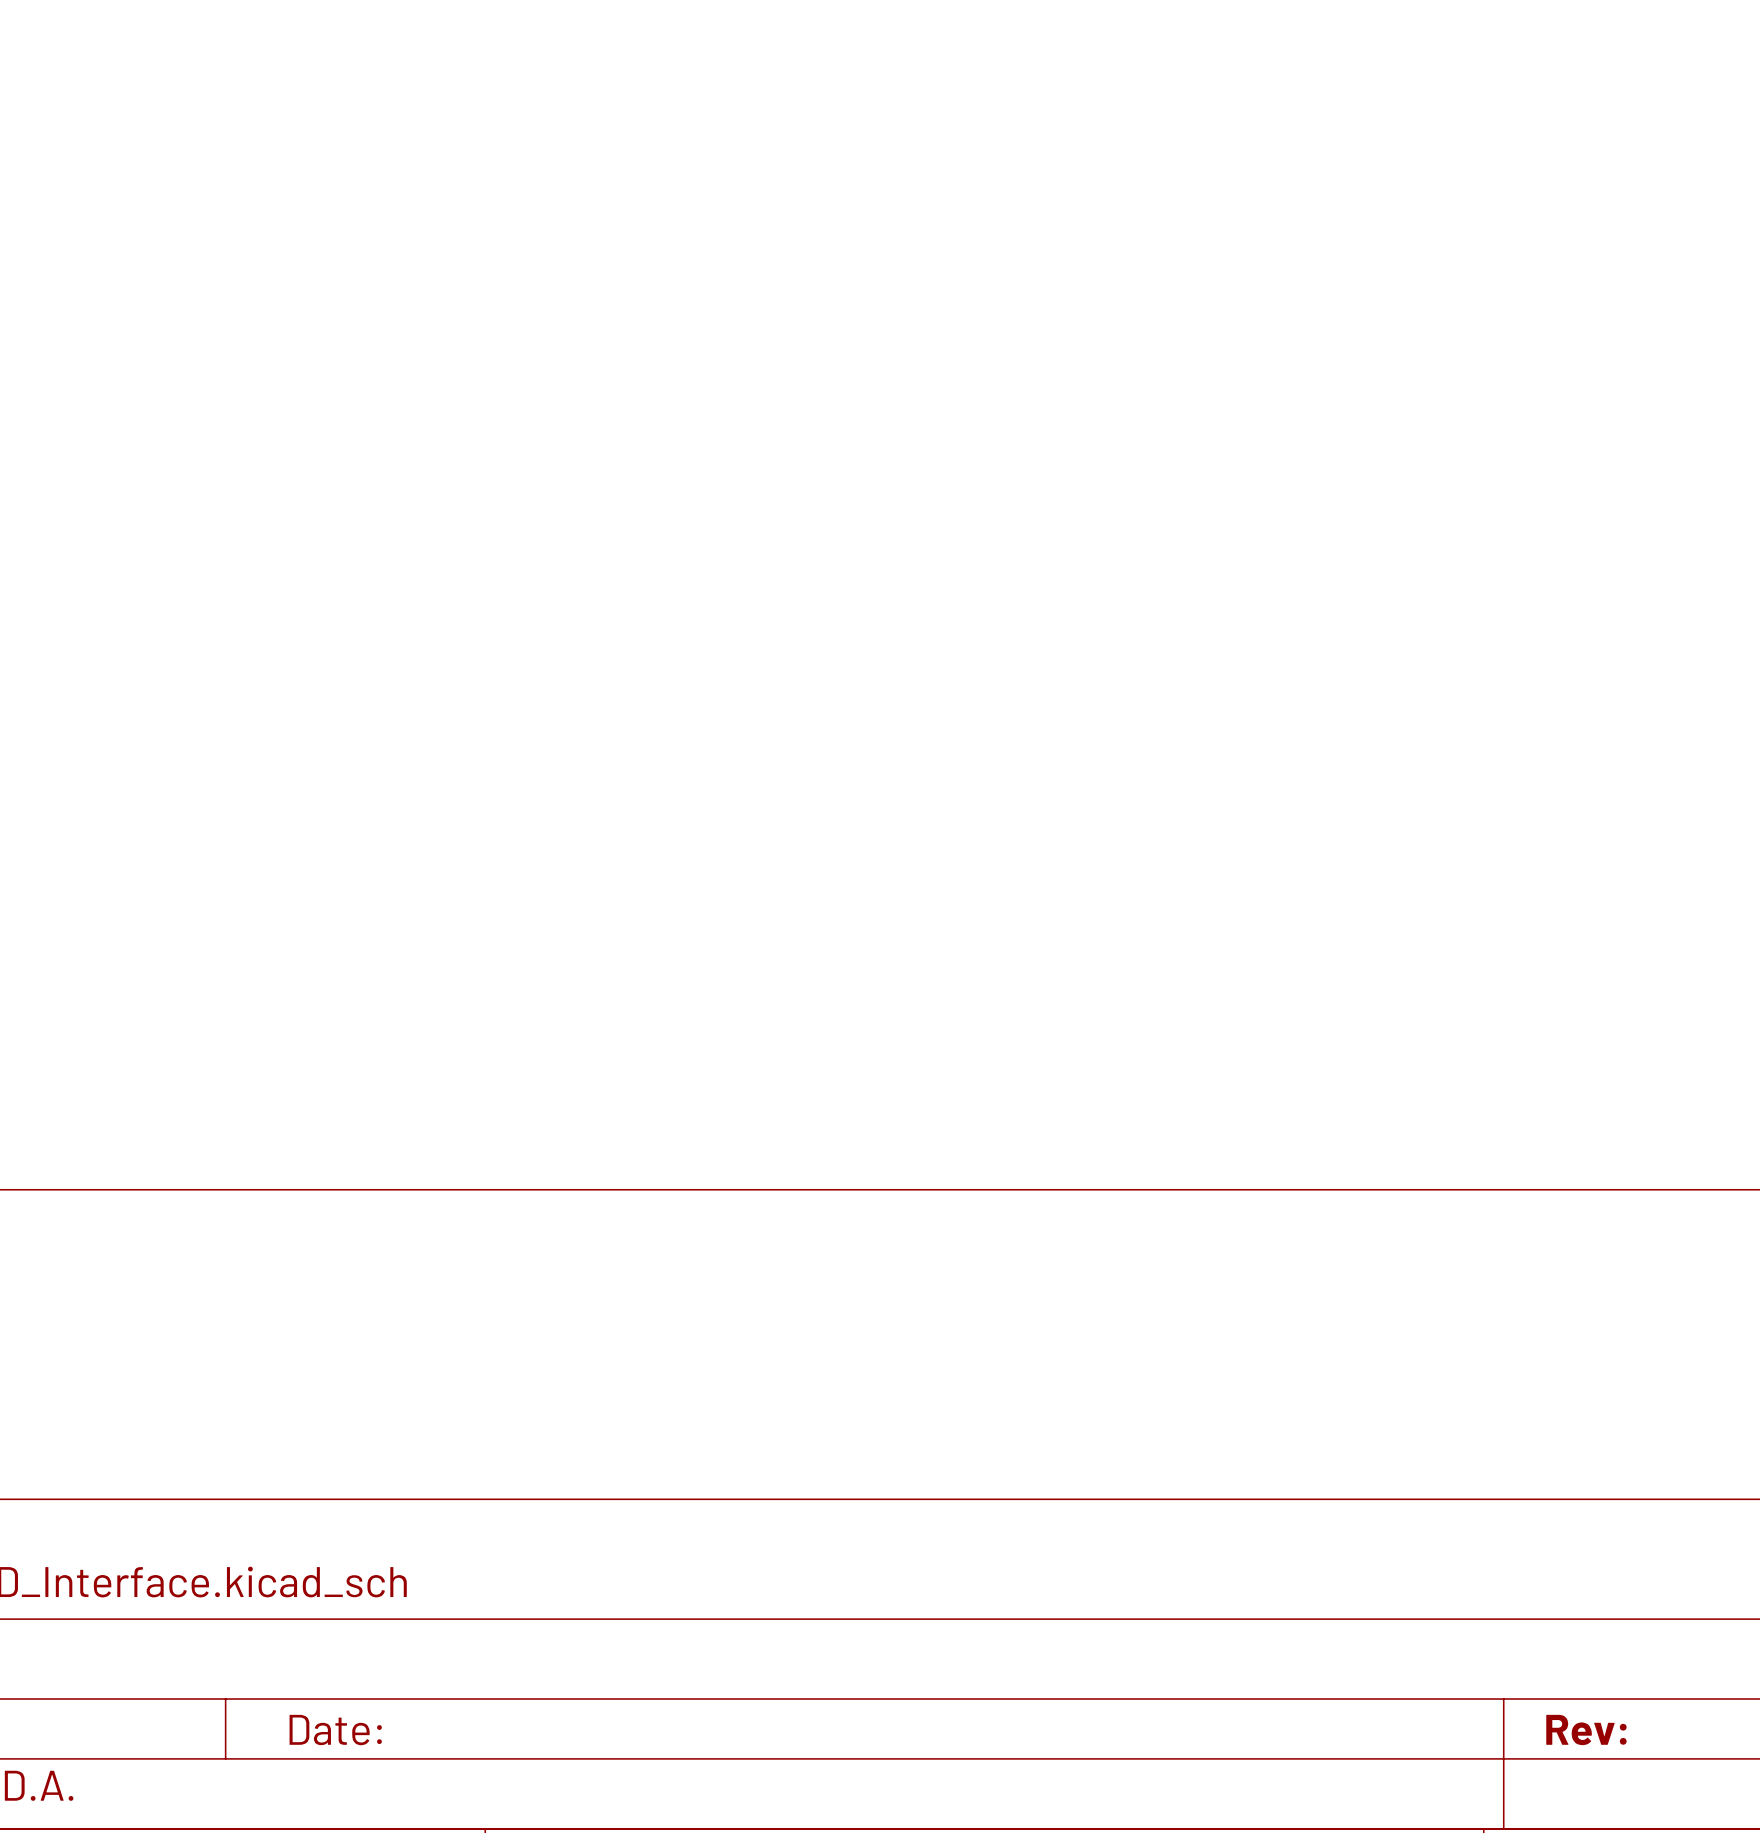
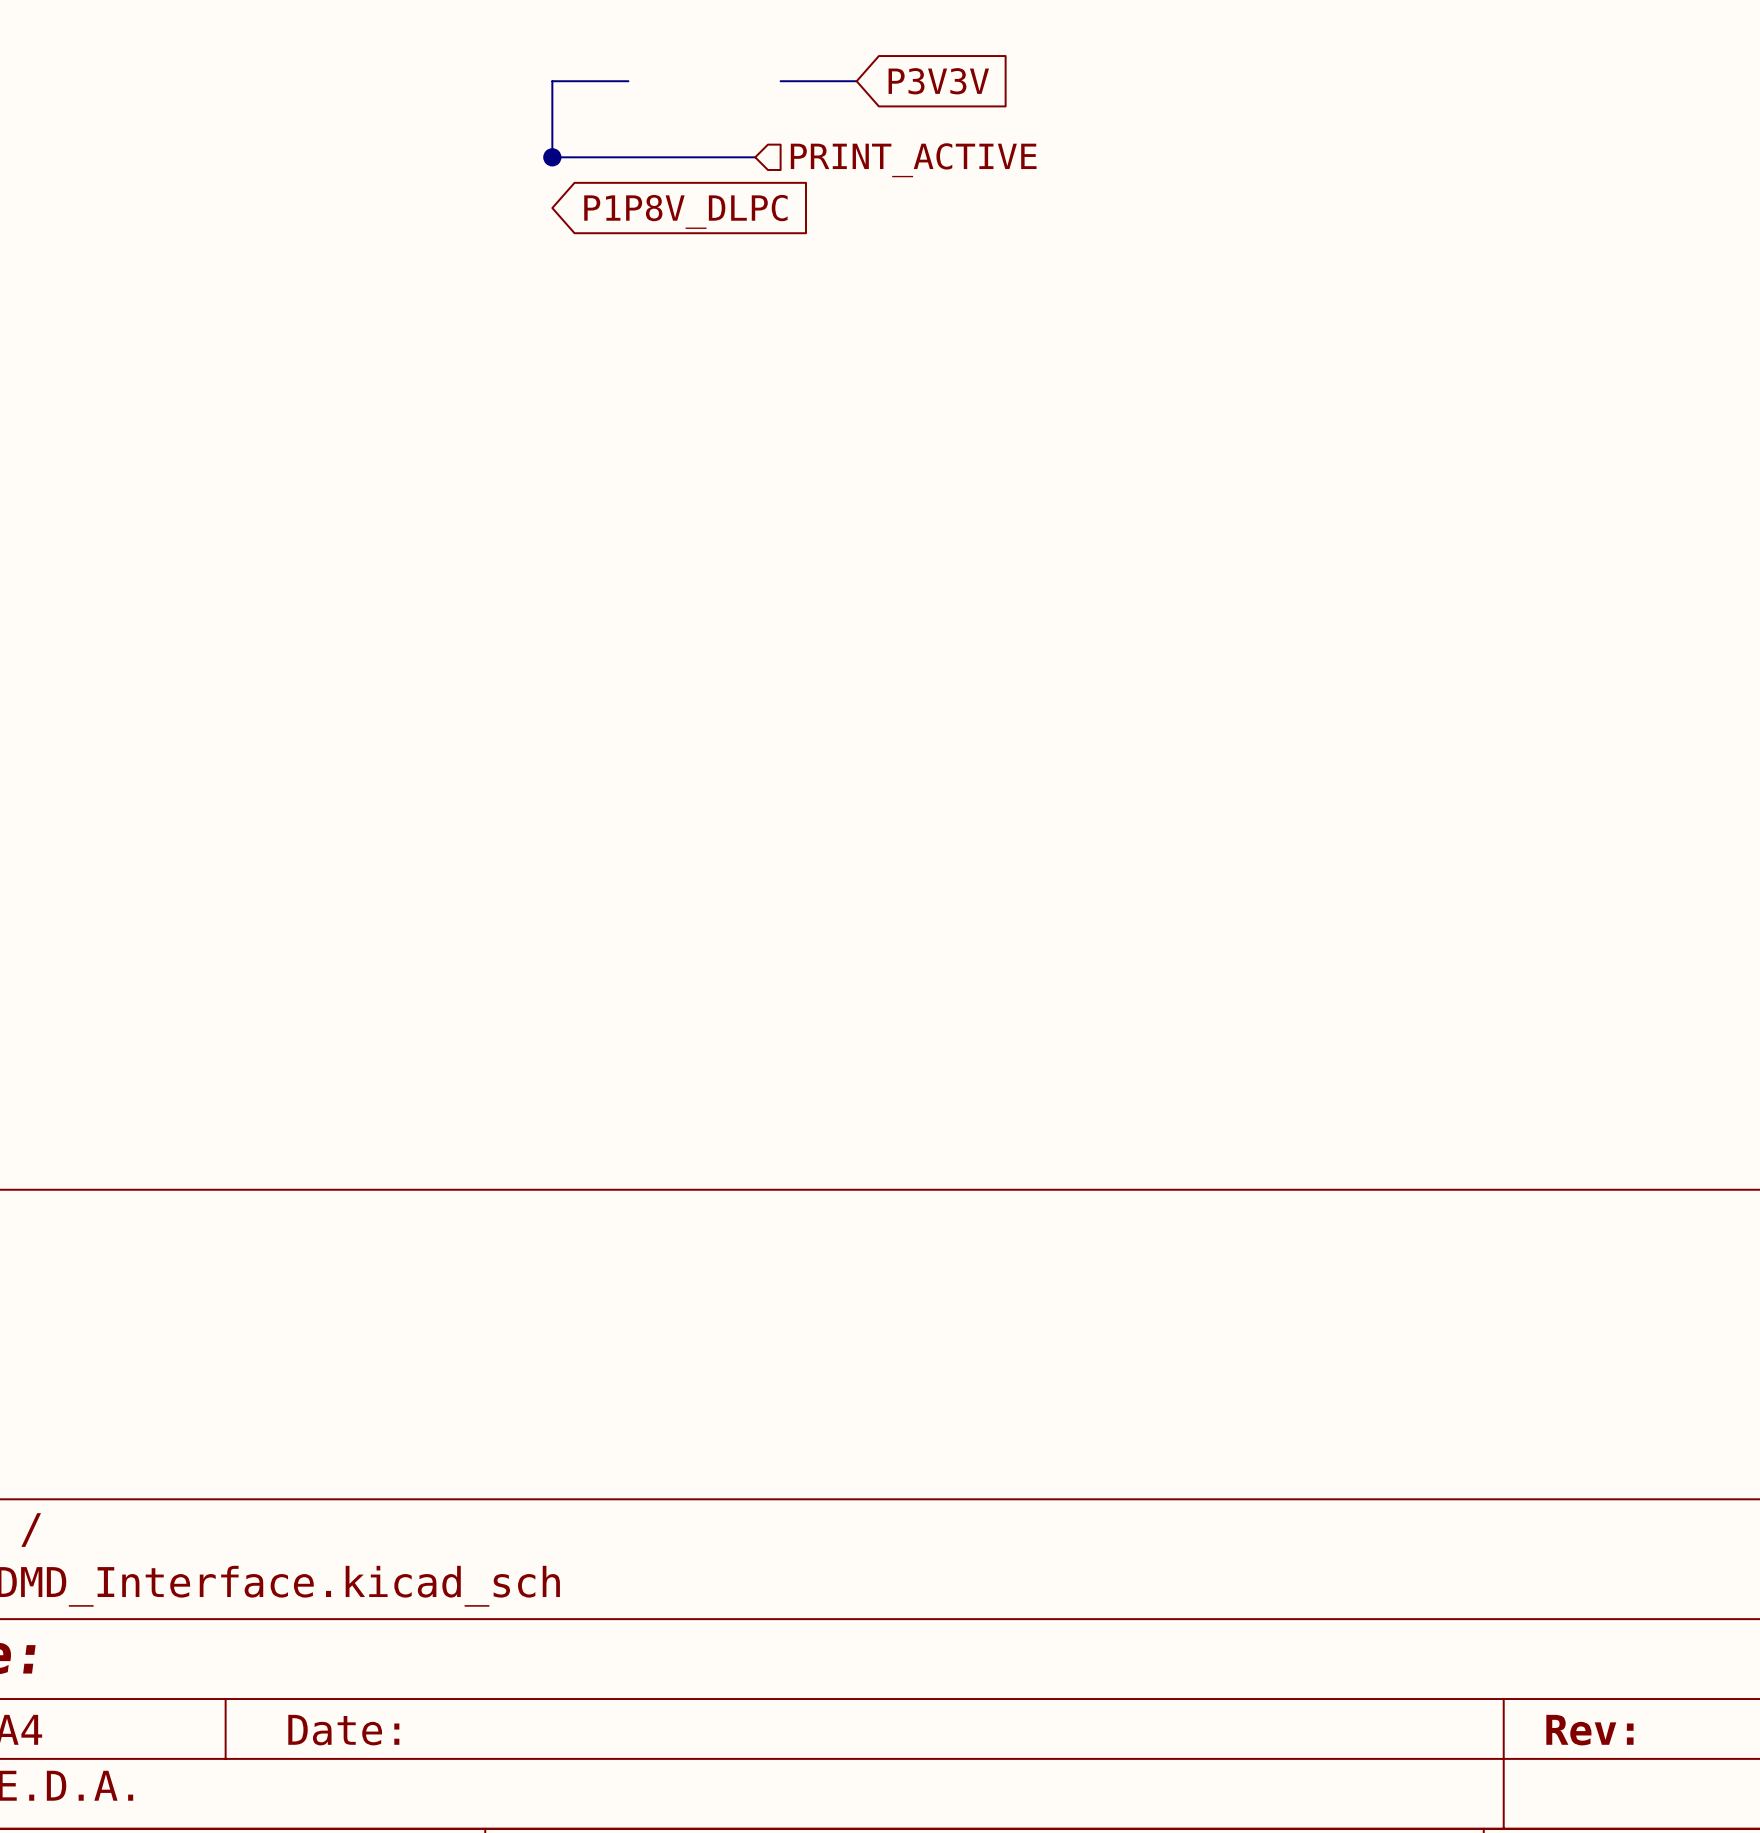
wire: none -> (628, 81) (552, 81) (552, 157) (755, 157)
wire: none -> (780, 81) (856, 81)
global label: none -> P3V3V (938, 81)
hierarchical label: none -> PRINT_ACTIVE (913, 160)
junction: none -> (552, 157)
global label: none -> P1P8V_DLPC (685, 211)

